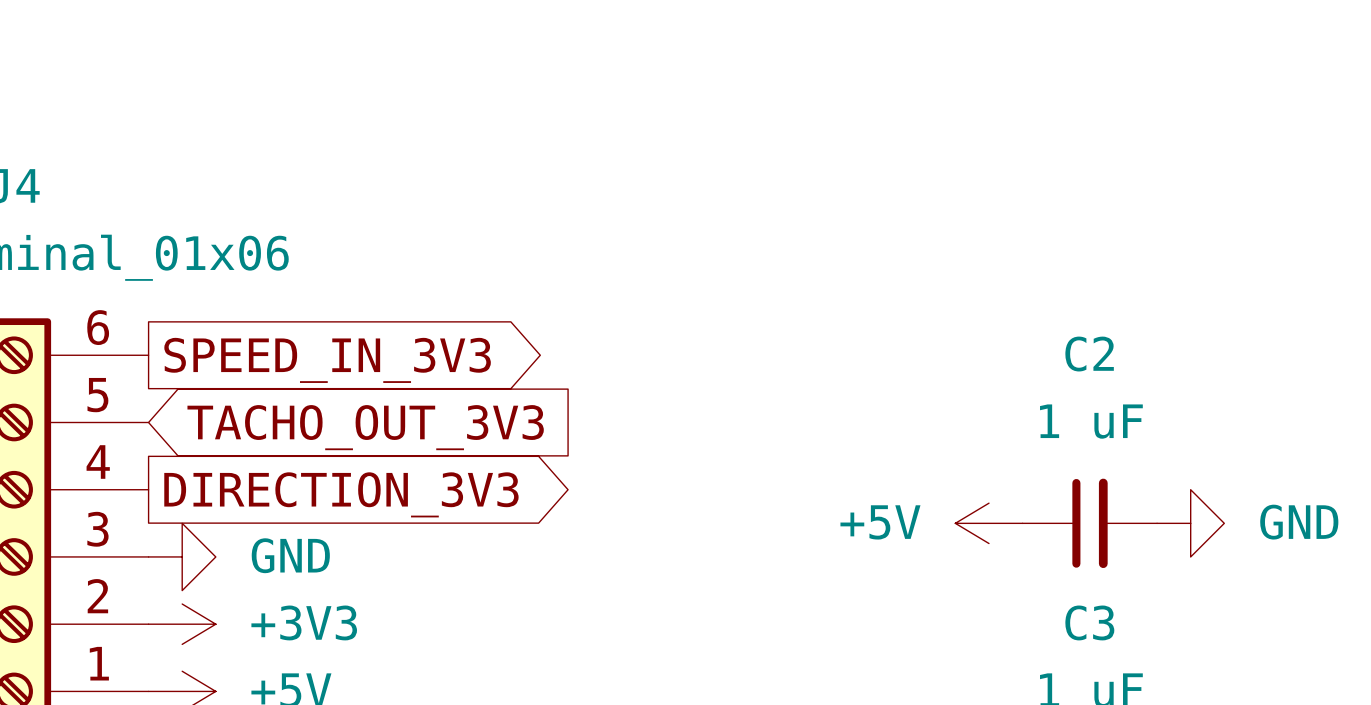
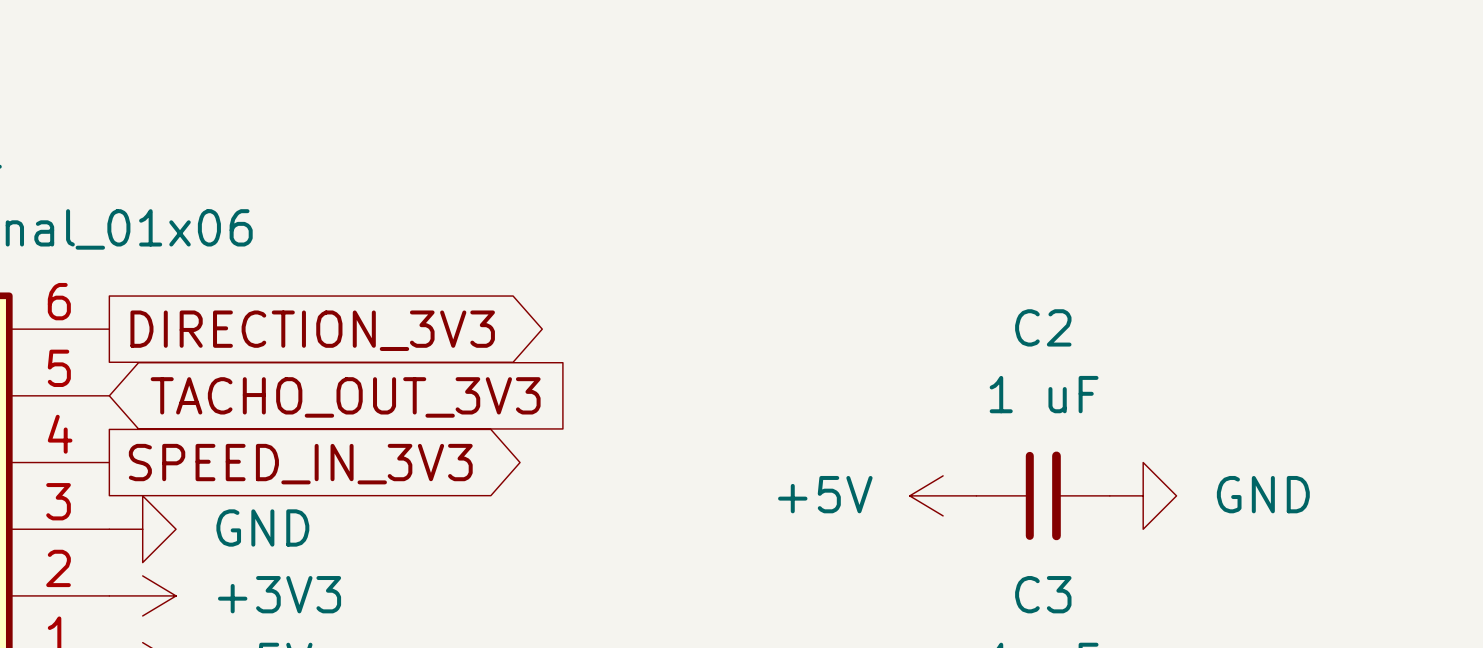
global label: SPEED_IN_3V3 (327, 360) -> DIRECTION_3V3 (312, 330)
global label: DIRECTION_3V3 (341, 494) -> SPEED_IN_3V3 (300, 464)

